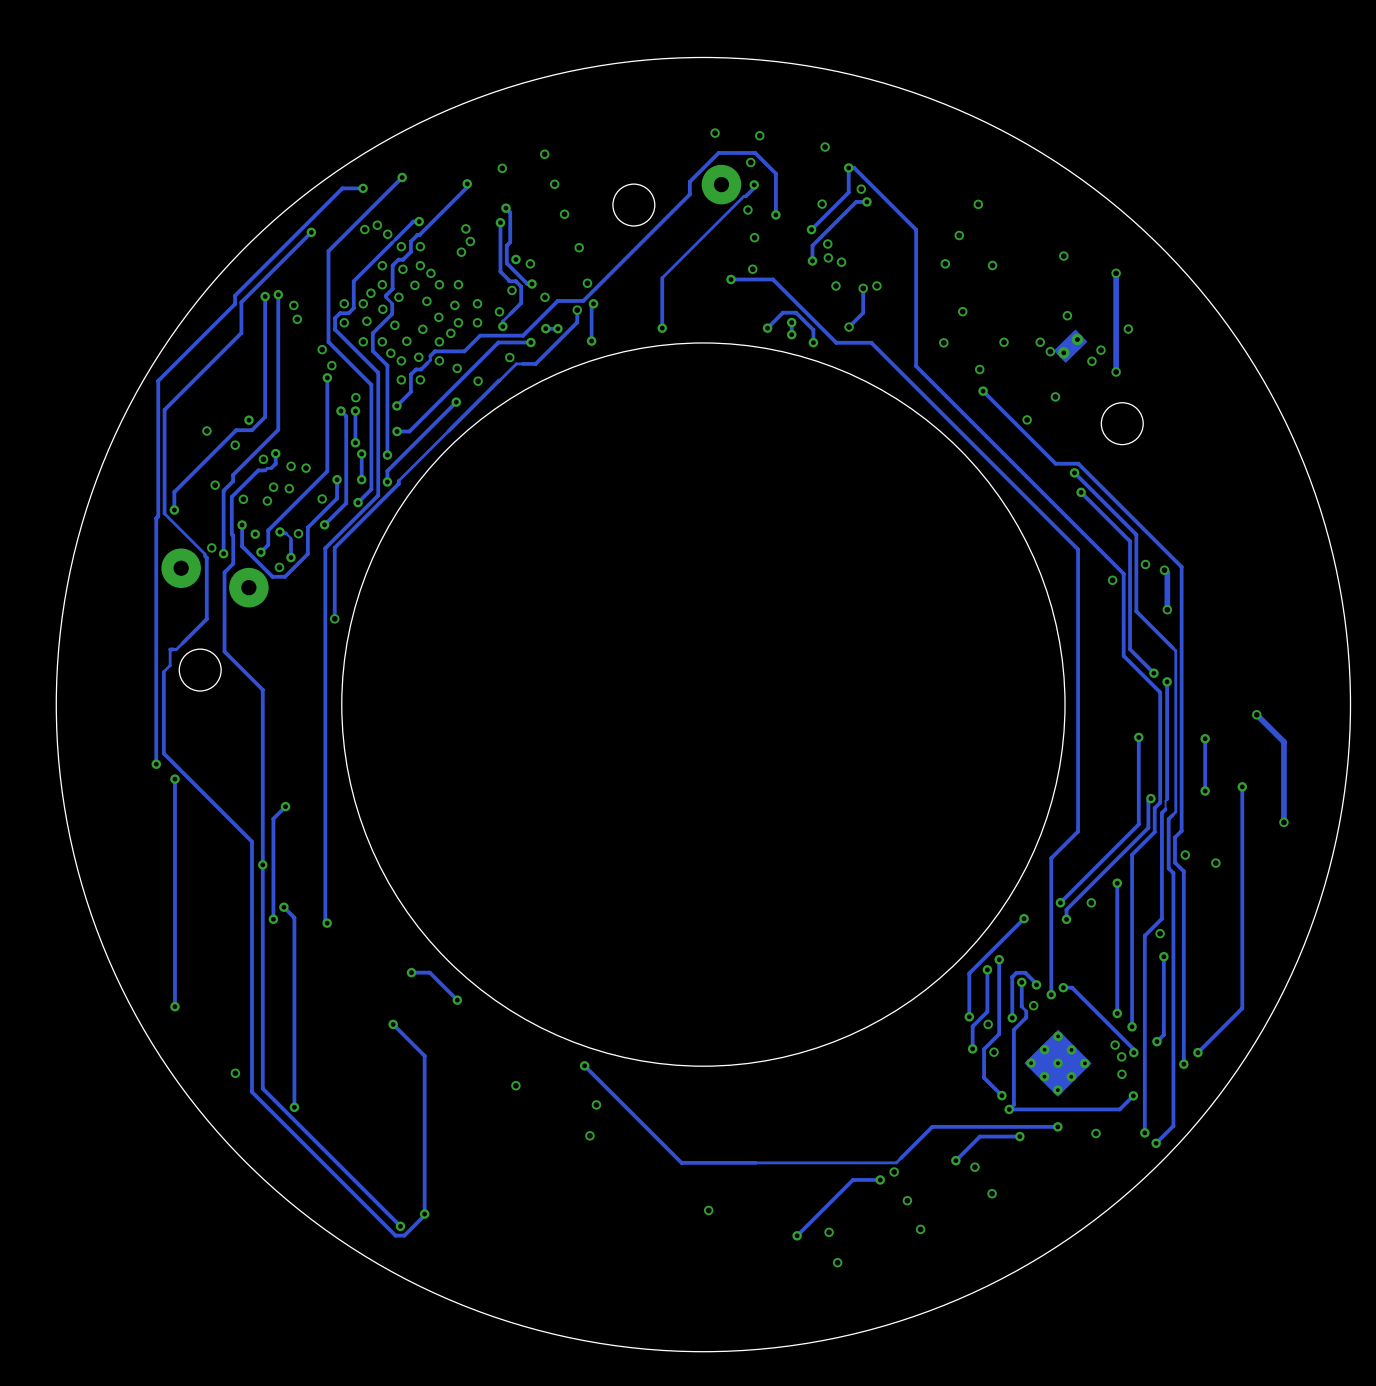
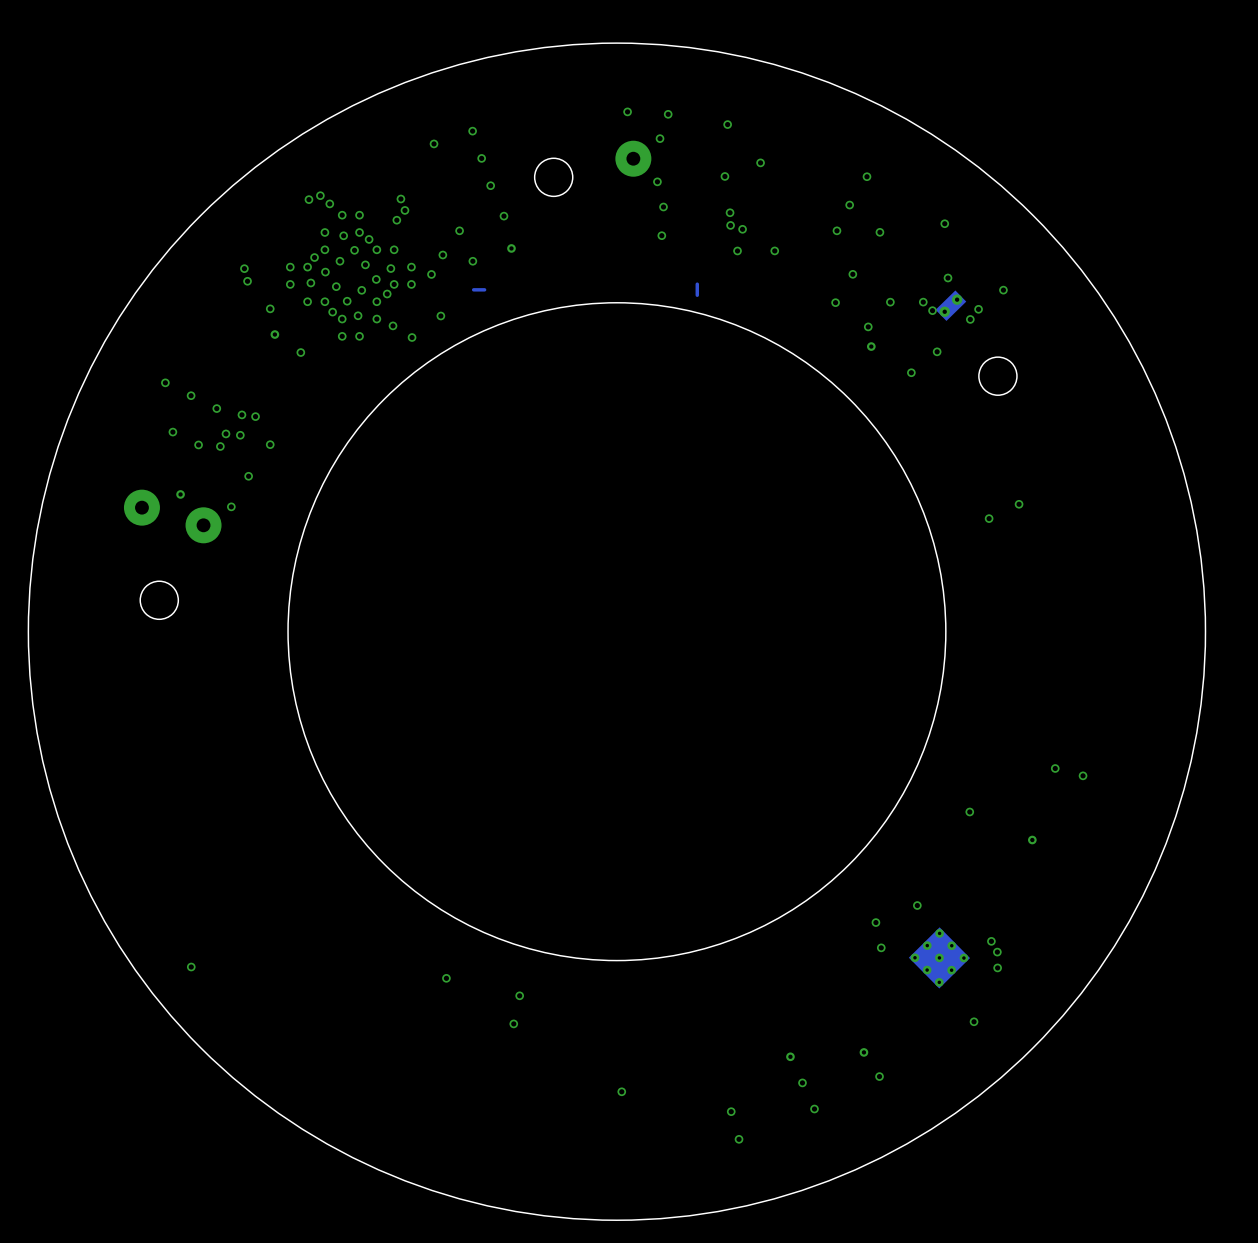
via: (848, 167) -> none
track: (402, 177) (328, 251) (328, 342) (371, 384) (371, 489) (358, 502) -> none
via: (402, 177) -> none
track: (467, 183) (467, 187) (410, 241) (410, 251) (403, 259) (398, 259) (392, 265) (392, 288) (386, 295) (392, 303) (392, 313) (372, 333) (372, 350) (387, 365) (387, 455) -> none
via: (467, 183) -> none
track: (754, 184) (754, 187) (662, 277) (662, 328) -> none
via: (754, 184) -> none
track: (363, 188) (342, 188) (235, 295) (235, 304) (158, 380) (156, 764) -> none
via: (363, 188) -> none
track: (866, 201) (856, 201) (812, 245) (812, 260) -> none
via: (866, 201) -> none
track: (505, 208) (510, 212) (510, 242) (506, 245) (506, 263) (527, 283) (531, 283) -> none
via: (505, 208) -> none
track: (775, 214) (775, 173) (755, 152) (718, 152) (689, 181) (689, 194) (583, 300) (557, 300) (523, 335) (480, 335) (464, 351) (435, 351) (430, 356) (430, 360) (421, 369) (415, 369) (410, 374) (410, 391) (396, 405) -> none
via: (775, 214) -> none
track: (419, 221) (413, 221) (353, 281) (353, 308) (348, 313) (340, 313) (335, 318) (335, 329) (378, 372) (378, 495) (325, 548) (325, 921) (327, 923) -> none
via: (419, 221) -> none
track: (500, 222) (500, 271) (509, 281) (515, 281) (521, 286) (521, 303) (502, 321) (502, 326) -> none
via: (500, 222) -> none
track: (811, 229) (848, 192) (848, 167) (854, 167) (916, 229) (916, 366) (1123, 573) (1123, 655) (1160, 692) (1160, 802) (1154, 808) (1154, 832) (1132, 854) (1132, 1026) -> none
via: (811, 229) -> none
track: (311, 232) (241, 302) (241, 333) (164, 409) (164, 513) (206, 557) (206, 619) (176, 649) (170, 649) (170, 665) (163, 671) (163, 753) (252, 841) (252, 1092) (395, 1235) (404, 1235) (424, 1215) (424, 1055) (393, 1024) -> none
via: (311, 232) -> none
via: (515, 259) -> none
via: (812, 260) -> none
track: (1116, 273) (1116, 372) -> none
via: (1116, 273) -> none
track: (731, 279) (772, 279) (836, 342) (871, 342) (1078, 549) (1078, 831) (1051, 858) (1051, 994) -> none
via: (731, 279) -> none
via: (531, 283) -> none
via: (587, 283) -> none
track: (863, 288) (863, 312) (849, 327) -> none
via: (863, 288) -> none
track: (278, 294) (278, 429) (233, 474) (233, 481) (223, 490) (223, 553) -> none
via: (278, 294) -> none
track: (265, 296) (265, 417) (251, 430) (236, 430) (174, 492) (174, 510) -> none
via: (265, 296) -> none
track: (593, 303) (591, 305) (591, 341) -> none
via position: (593, 303) -> (511, 248)
track: (577, 310) (577, 322) (535, 363) (516, 363) (334, 547) (334, 618) -> none
via: (577, 310) -> none
via: (791, 322) -> none
via: (502, 326) -> none
via: (849, 327) -> none
via: (545, 328) -> none
via: (557, 328) -> none
via: (662, 328) -> none
track: (767, 328) (783, 312) (796, 312) (813, 330) (813, 342) -> none
via: (767, 328) -> none
via: (791, 334) -> none
via: (591, 341) -> none
track: (530, 342) (498, 342) (409, 431) (397, 431) -> none
via: (530, 342) -> none
via: (813, 342) -> none
via: (331, 365) -> none
via: (1116, 372) -> none
track: (327, 377) (327, 471) (268, 530) (268, 544) (260, 552) -> none
track: (983, 391) (1055, 463) (1078, 463) (1181, 566) (1181, 830) (1175, 837) (1175, 862) (1183, 871) (1183, 1064) -> none
track: (456, 402) (387, 470) (387, 481) -> none
via: (456, 402) -> none
via: (396, 405) -> none
track: (340, 411) (346, 416) (346, 503) (324, 524) -> none
via: (340, 411) -> none
track: (355, 411) (355, 442) -> none
via: (355, 411) -> none
via: (248, 420) -> none
via: (397, 431) -> none
via: (355, 442) -> none
track: (275, 453) (275, 463) (271, 468) (258, 470) (231, 496) (233, 563) (224, 572) (224, 651) (262, 689) (262, 1088) (400, 1226) -> none
via: (275, 453) -> none
track: (361, 453) (361, 479) -> none
via: (361, 453) -> none
via: (387, 455) -> none
track: (1074, 472) (1136, 534) (1136, 611) (1175, 650) (1175, 811) (1168, 819) (1168, 868) (1173, 873) (1173, 1125) (1156, 1143) -> none
via: (1074, 472) -> none
track: (337, 479) (337, 498) (307, 527) (307, 553) (285, 576) (272, 576) (242, 546) (242, 525) -> none
via: (337, 479) -> none
via: (361, 479) -> none
via: (387, 481) -> none
track: (1081, 492) (1130, 541) (1130, 649) (1153, 673) -> none
via: (1081, 492) -> none
via: (358, 502) -> none
via: (174, 510) -> none
via: (324, 524) -> none
via: (242, 525) -> none
track: (280, 531) (286, 533) (290, 538) (290, 557) -> none
via: (280, 531) -> none
via: (255, 534) -> none
via: (211, 547) -> none
via: (260, 552) -> none
via: (290, 557) -> none
track: (1164, 570) (1167, 573) (1167, 609) -> none
via: (1164, 570) -> none
via: (1167, 609) -> none
via: (334, 618) -> none
via: (1153, 673) -> none
track: (1167, 681) (1167, 799) (1165, 809) (1161, 812) (1161, 918) (1144, 935) (1144, 1132) -> none
via: (1167, 681) -> none
track: (1256, 714) (1283, 741) (1283, 822) -> none
via: (1256, 714) -> none
track: (1138, 737) (1138, 824) (1060, 902) -> none
via: (1138, 737) -> none
track: (1205, 738) (1205, 791) -> none
via: (1205, 738) -> none
via: (156, 764) -> none
track: (174, 779) (174, 1006) -> none
via: (174, 779) -> none
track: (1242, 786) (1242, 1008) (1197, 1052) -> none
via: (1242, 786) -> none
via: (1205, 791) -> none
track: (1150, 798) (1148, 801) (1148, 827) (1066, 909) (1066, 919) -> none
via: (1150, 798) -> none
track: (285, 806) (273, 818) (273, 919) -> none
via: (285, 806) -> none
via: (1283, 822) -> none
via: (262, 864) -> none
track: (1117, 883) (1117, 1013) -> none
via: (1117, 883) -> none
via: (1060, 902) -> none
track: (283, 907) (294, 917) (294, 1107) -> none
via: (283, 907) -> none
track: (1024, 918) (969, 973) (969, 1016) -> none
via: (1024, 918) -> none
via: (273, 919) -> none
via: (1066, 919) -> none
via: (327, 923) -> none
via: (1160, 933) -> none
track: (1163, 956) (1163, 1034) (1156, 1041) -> none
via position: (1163, 956) -> (1032, 840)
track: (999, 959) (999, 1034) (984, 1049) (984, 1077) (1001, 1095) -> none
via: (999, 959) -> none
track: (987, 969) (987, 1011) (972, 1026) (972, 1048) -> none
via: (987, 969) -> none
track: (411, 972) (429, 972) (457, 1000) -> none
via: (411, 972) -> none
track: (1021, 982) (1021, 1006) -> none
via: (1021, 982) -> none
track: (1036, 984) (1025, 972) (1016, 972) (1012, 977) (1012, 1017) -> none
via: (1036, 984) -> none
track: (1063, 987) (1072, 987) (1133, 1049) (1133, 1052) -> none
via: (1063, 987) -> none
via: (1051, 994) -> none
via: (457, 1000) -> none
via: (174, 1006) -> none
track: (1021, 1006) (1026, 1011) (1026, 1017) (1013, 1029) (1013, 1104) (1009, 1109) (1119, 1109) (1133, 1095) -> none
via: (1117, 1013) -> none
via: (969, 1016) -> none
via: (1012, 1017) -> none
via: (393, 1024) -> none
via: (1132, 1026) -> none
via: (1156, 1041) -> none
via: (972, 1048) -> none
via: (1133, 1052) -> none
via: (1197, 1052) -> none
via: (1183, 1064) -> none
track: (584, 1065) (681, 1162) (896, 1162) (932, 1126) (1057, 1126) -> none
via: (584, 1065) -> none
via: (1001, 1095) -> none
via: (1133, 1095) -> none
via: (294, 1107) -> none
via: (1009, 1109) -> none
via: (1057, 1126) -> none
via: (1144, 1132) -> none
track: (1019, 1136) (979, 1136) (955, 1160) -> none
via: (1019, 1136) -> none
via: (1156, 1143) -> none
via position: (955, 1160) -> (863, 1052)
via: (974, 1167) -> none
via: (894, 1172) -> none
track: (880, 1179) (852, 1179) (797, 1235) -> none
via position: (880, 1179) -> (790, 1056)
via: (424, 1214) -> none
via: (400, 1226) -> none
via: (797, 1235) -> none

